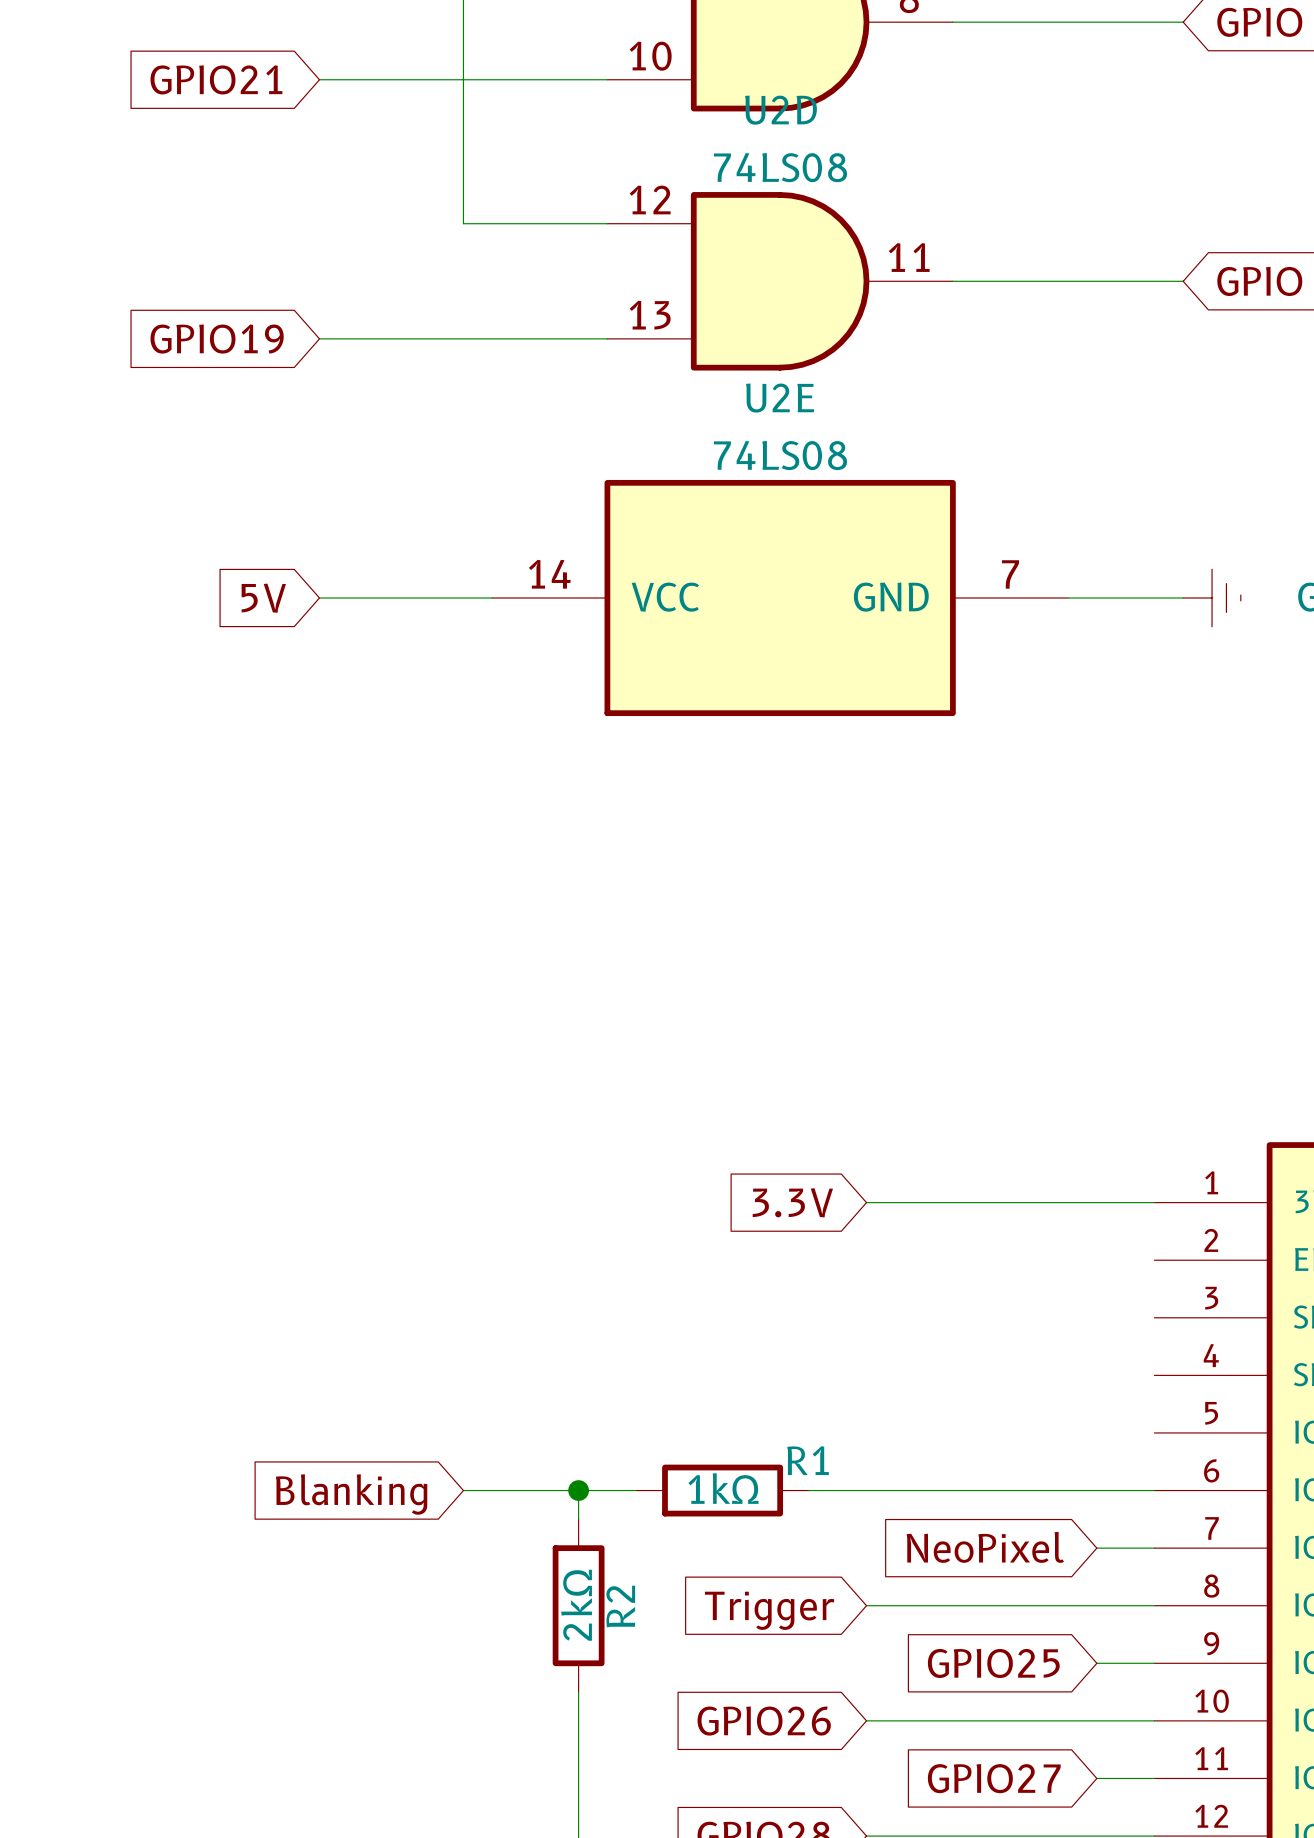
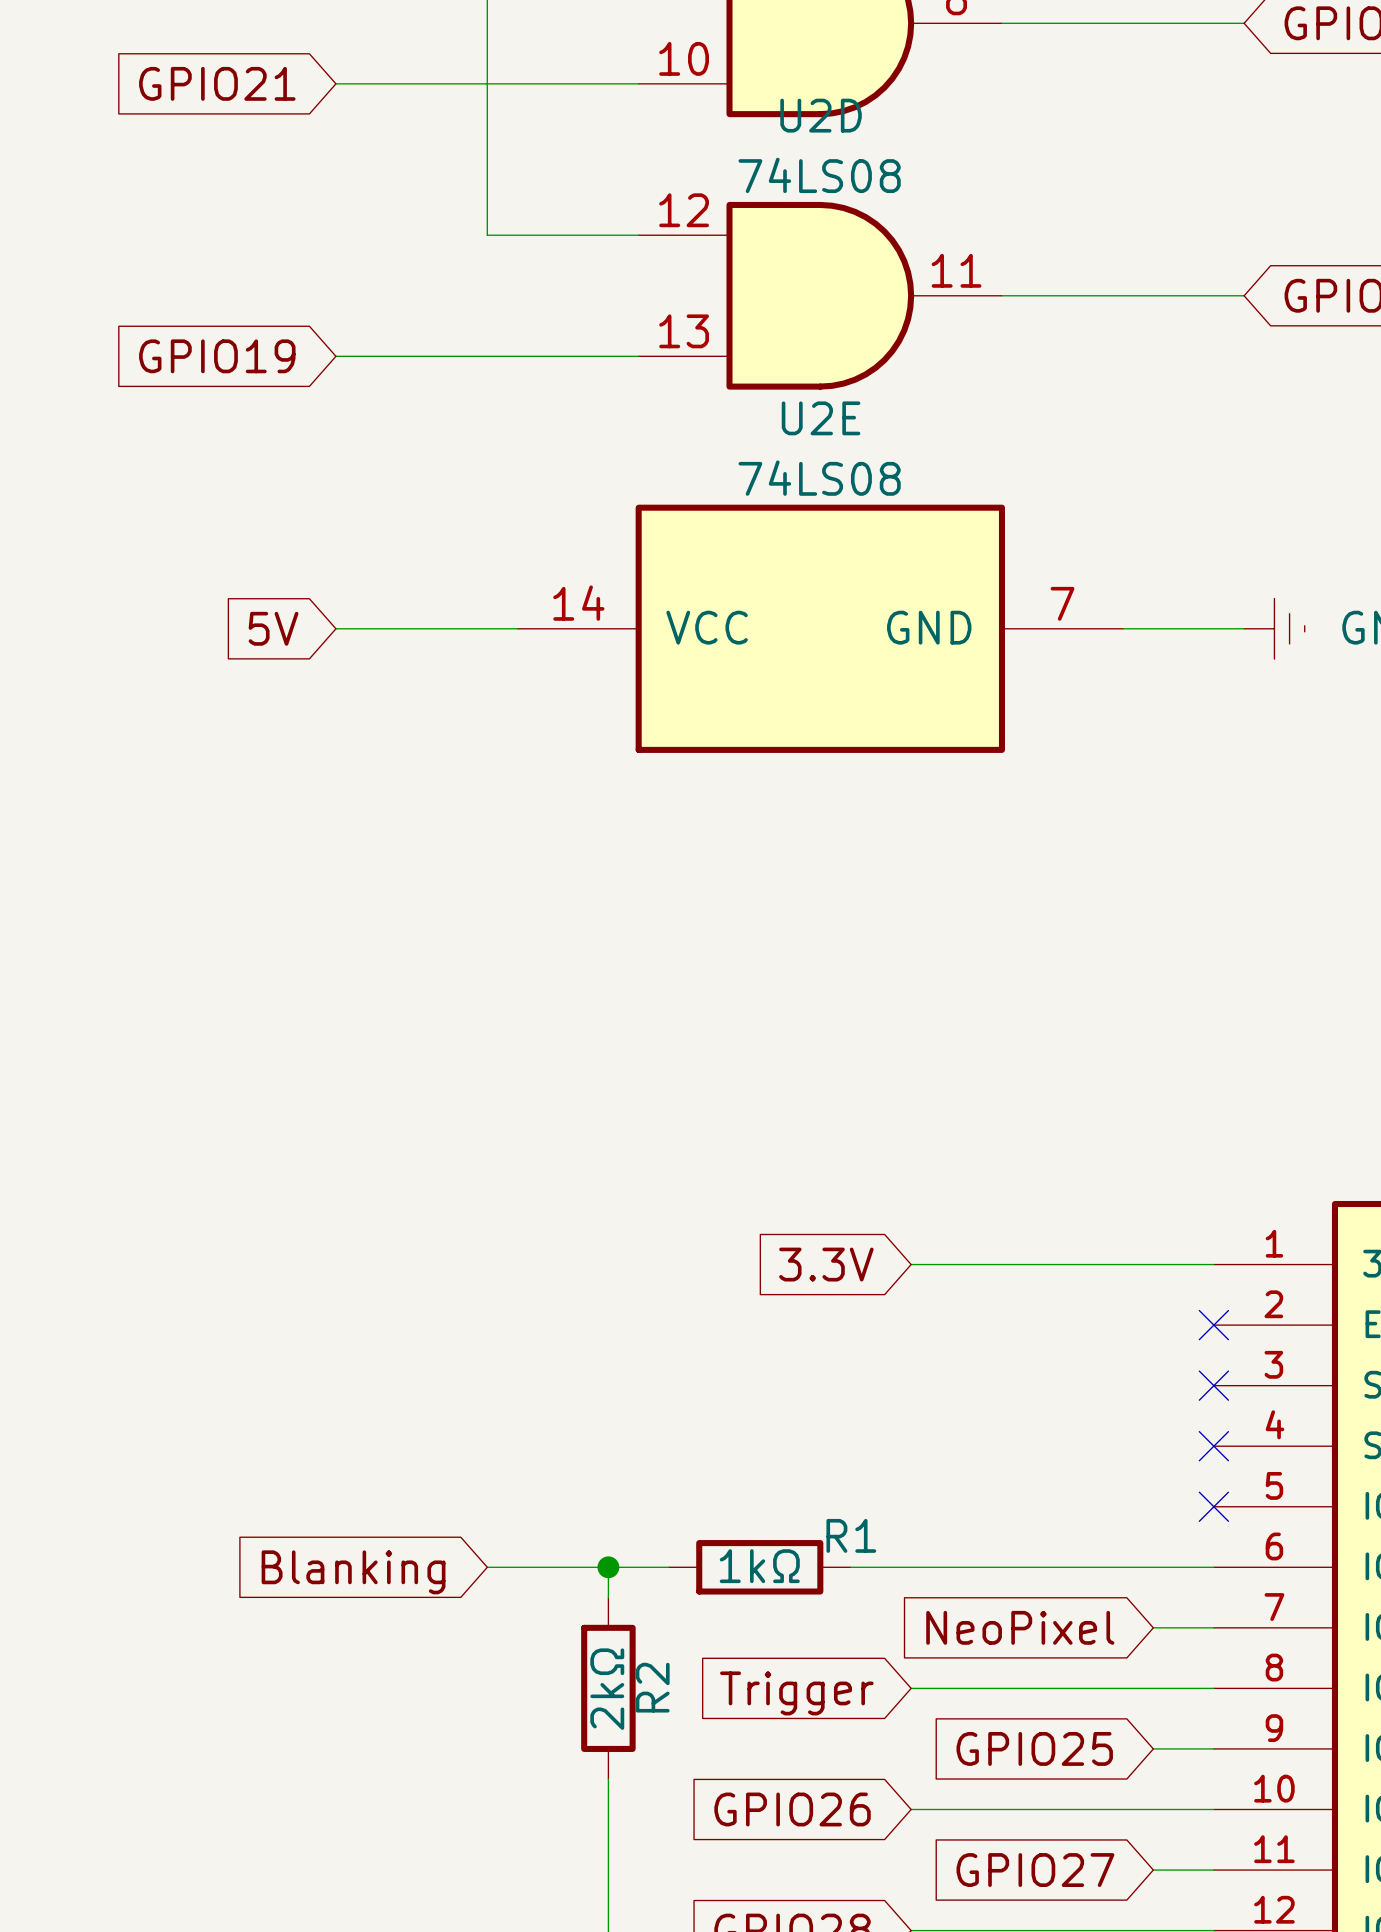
no-connect mark: none -> (1213, 1325)
no-connect mark: none -> (1213, 1385)
no-connect mark: none -> (1213, 1446)
no-connect mark: none -> (1213, 1506)

